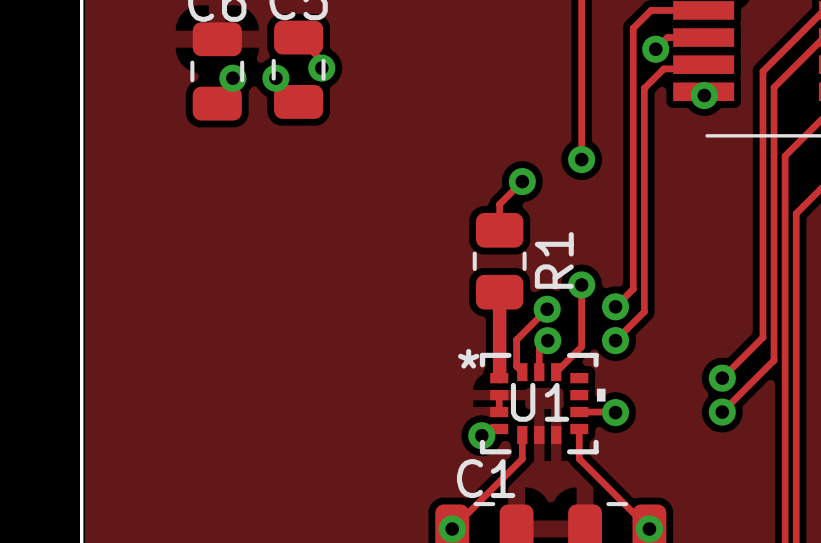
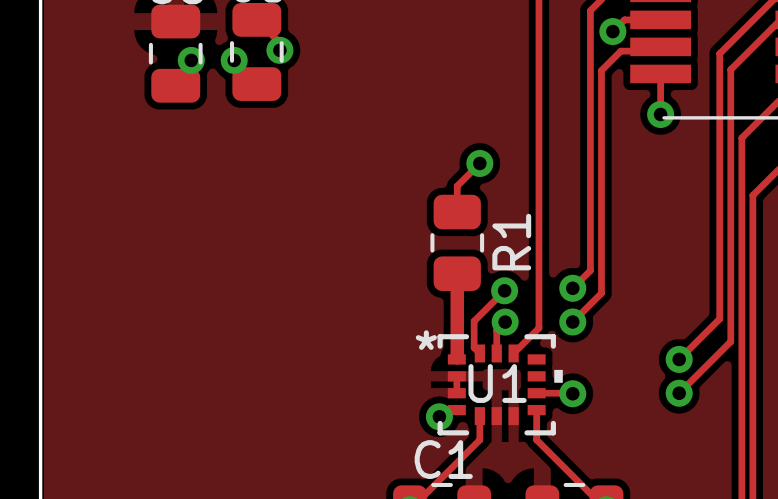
track: none -> (660, 73) (660, 114)
via position: (704, 95) -> (660, 114)
track: none -> (538, 141) (538, 266)
via: (581, 159) -> none
via: (581, 284) -> none

